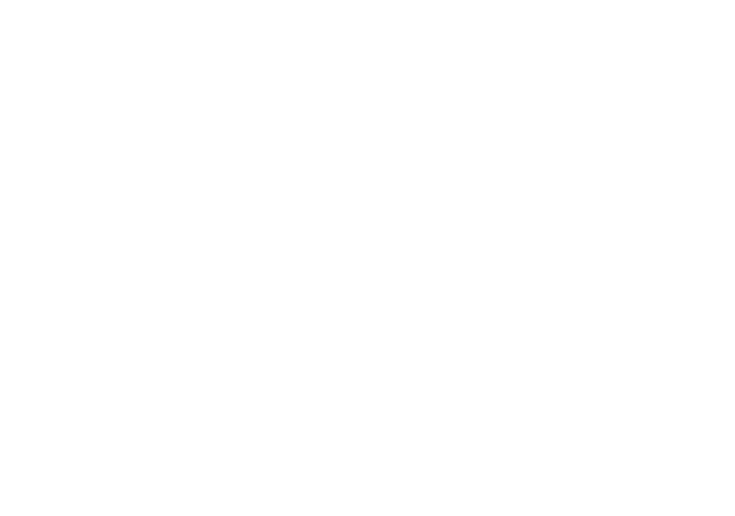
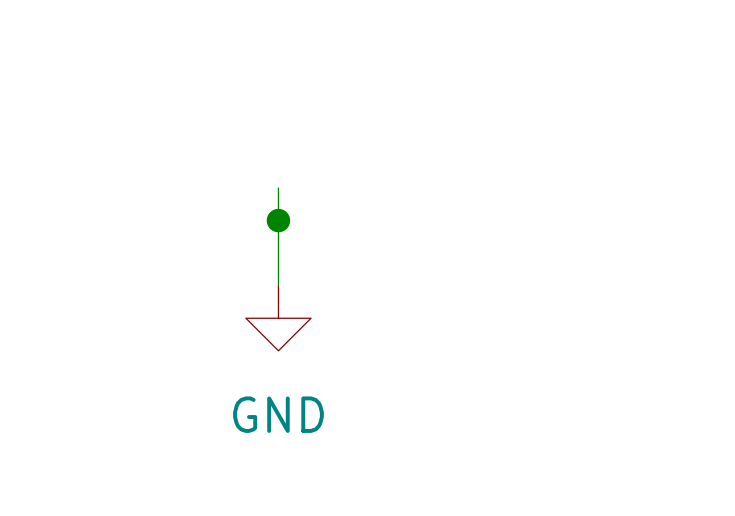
wire: none -> (278, 188) (278, 285)
junction: none -> (278, 220)
power symbol: none -> GND (278, 318)

